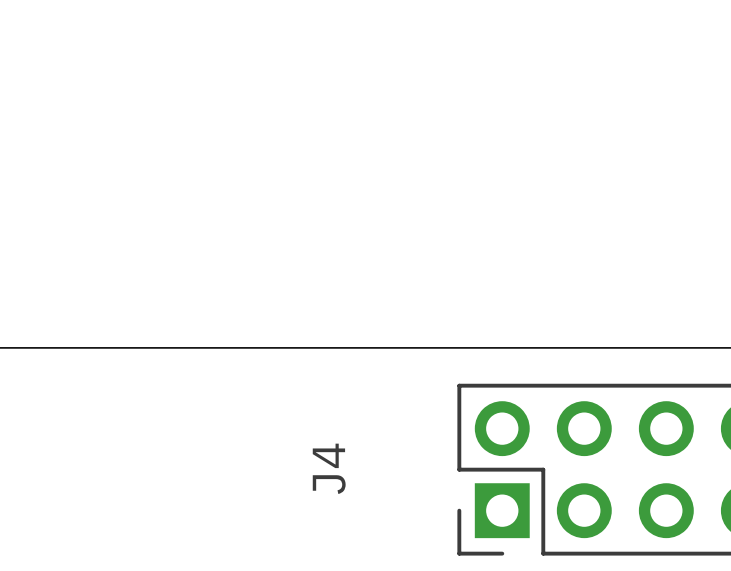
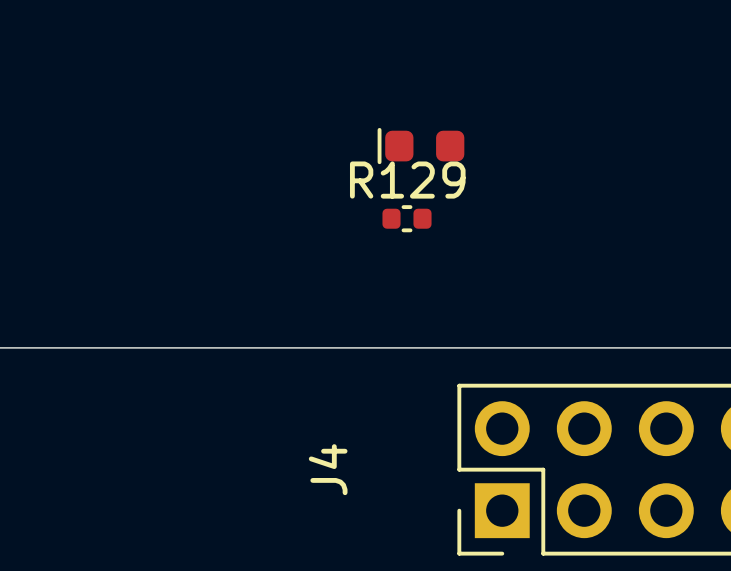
part: none -> (420, 146)
R129: none -> (407, 218)

